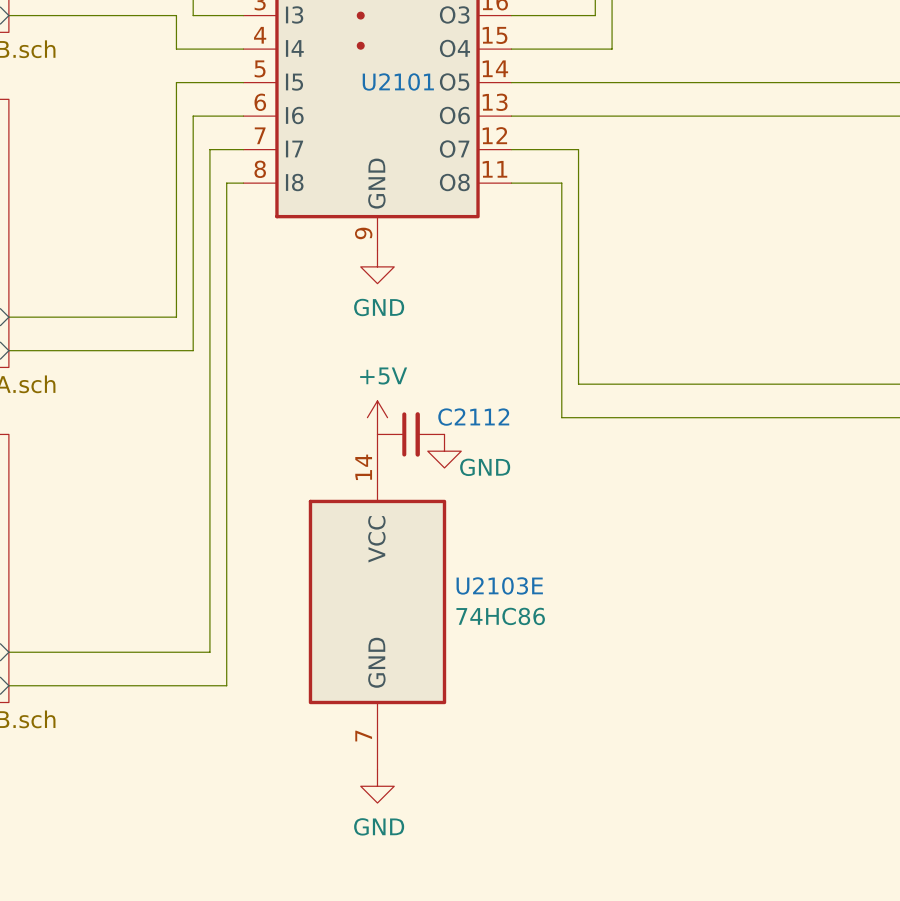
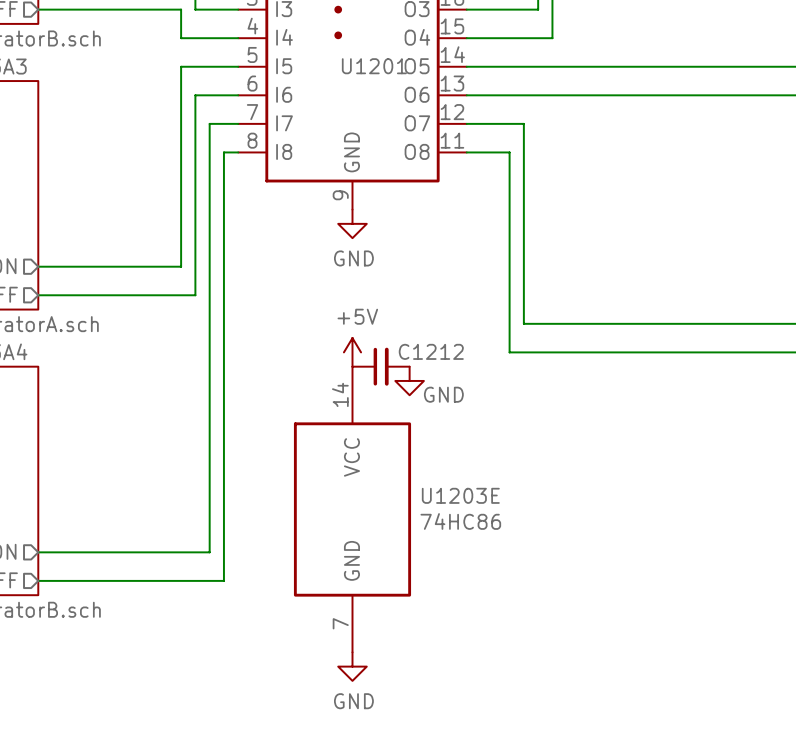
U2101 name: U2101 (398, 81) -> U1201 (374, 66)
C2112 name: C2112 (473, 417) -> C1212 (431, 351)
U2103E name: U2103E (499, 585) -> U1203E (460, 495)

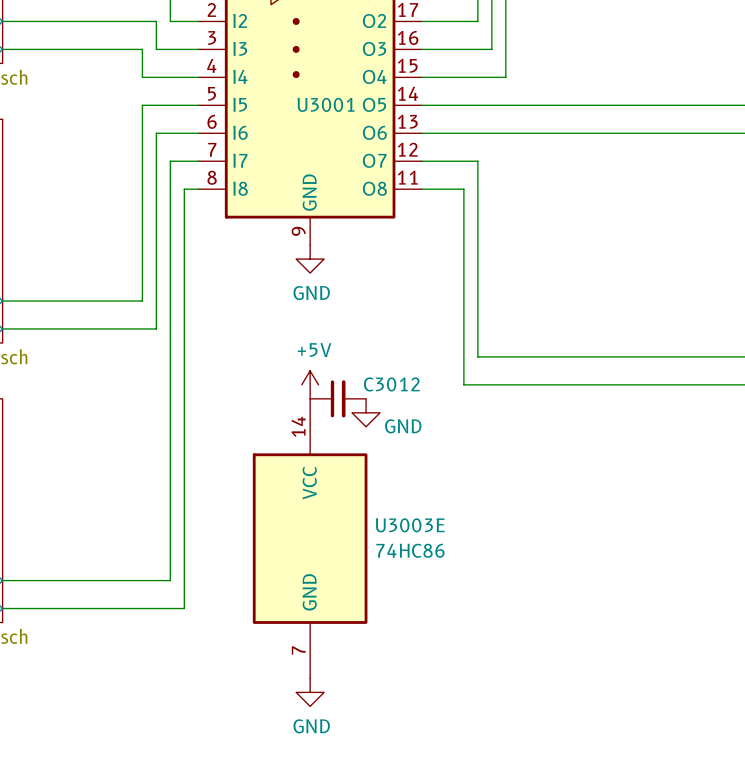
U1201 name: U1201 (374, 66) -> U3001 (326, 104)
C1212 name: C1212 (431, 351) -> C3012 (391, 384)
U1203E name: U1203E (460, 495) -> U3003E (410, 525)

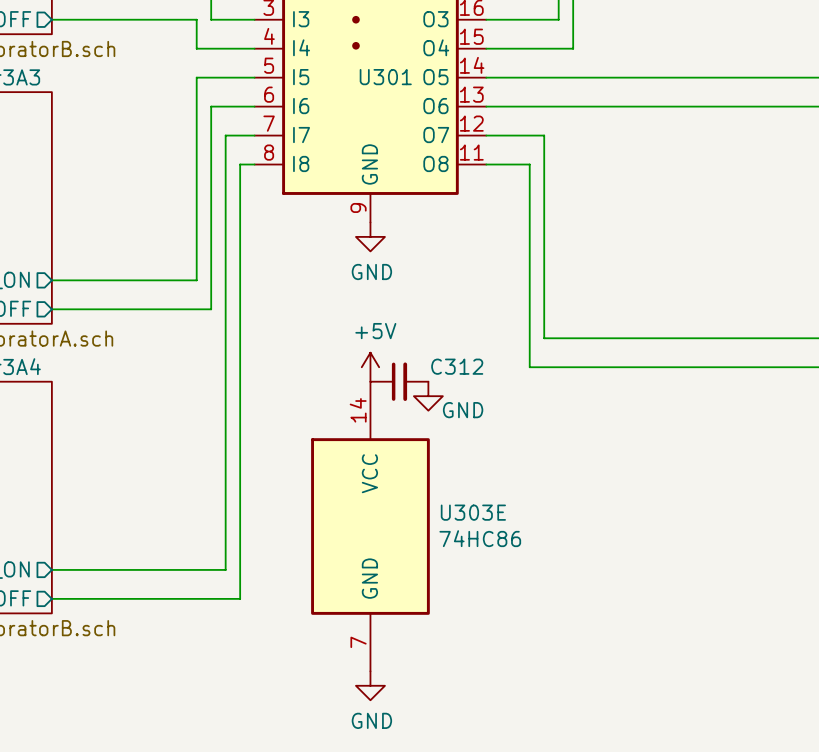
U3001 name: U3001 (326, 104) -> U301 (385, 77)
C3012 name: C3012 (391, 384) -> C312 (457, 366)
U3003E name: U3003E (410, 525) -> U303E (473, 512)

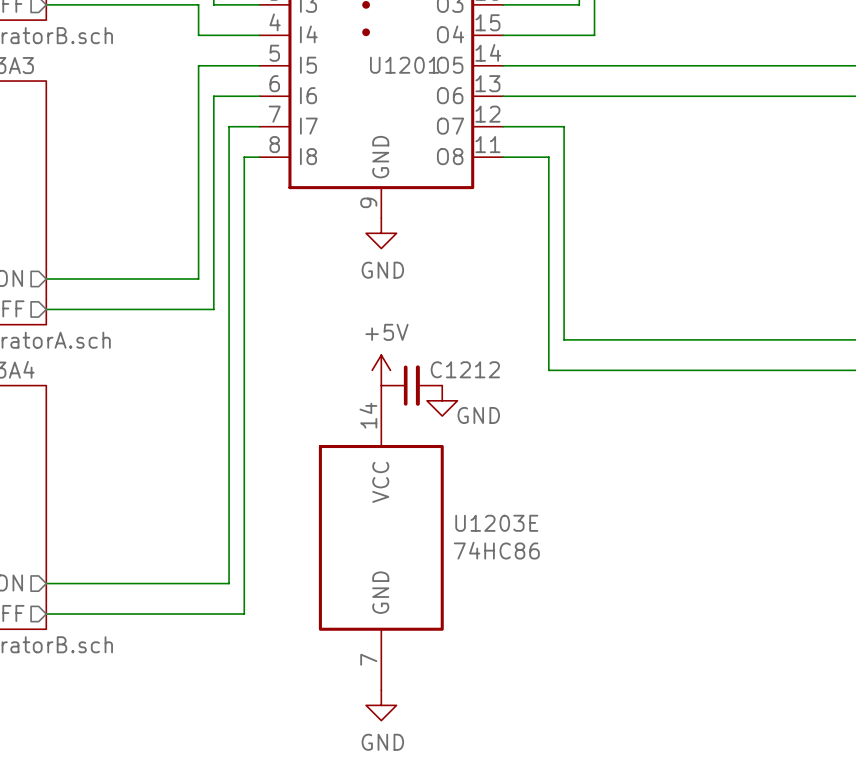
U301 name: U301 (385, 77) -> U1201 (404, 65)
C312 name: C312 (457, 366) -> C1212 (465, 369)
U303E name: U303E (473, 512) -> U1203E (496, 523)

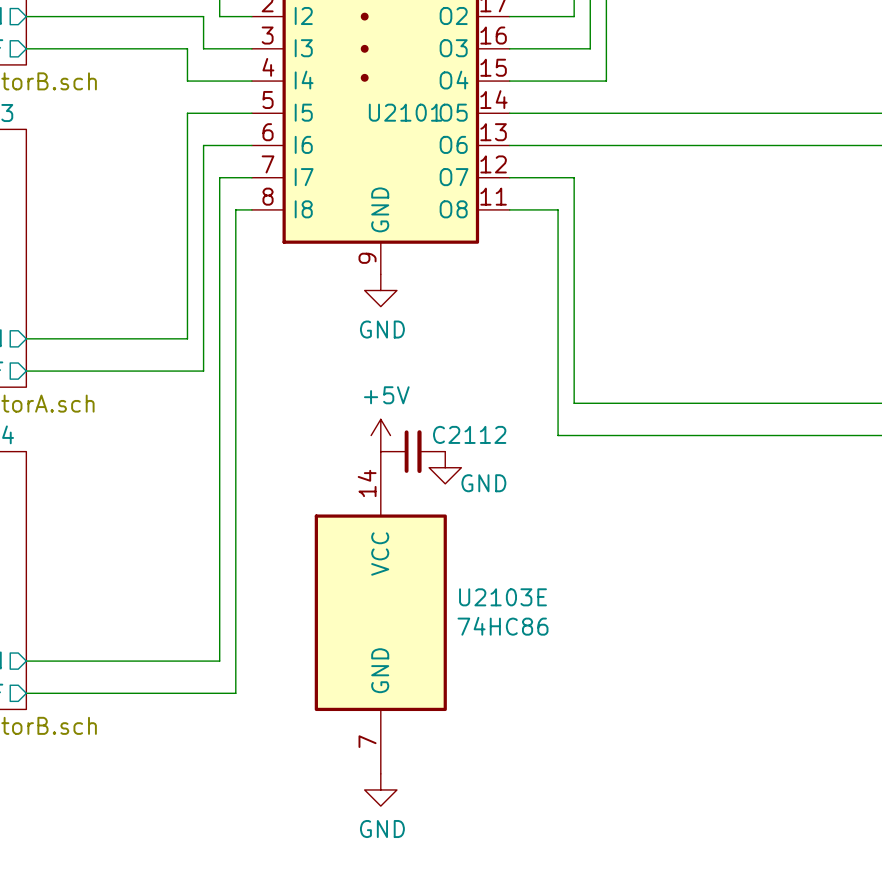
U1201 name: U1201 (404, 65) -> U2101 (405, 112)
C1212 name: C1212 (465, 369) -> C2112 (469, 434)
U1203E name: U1203E (496, 523) -> U2103E (503, 597)

